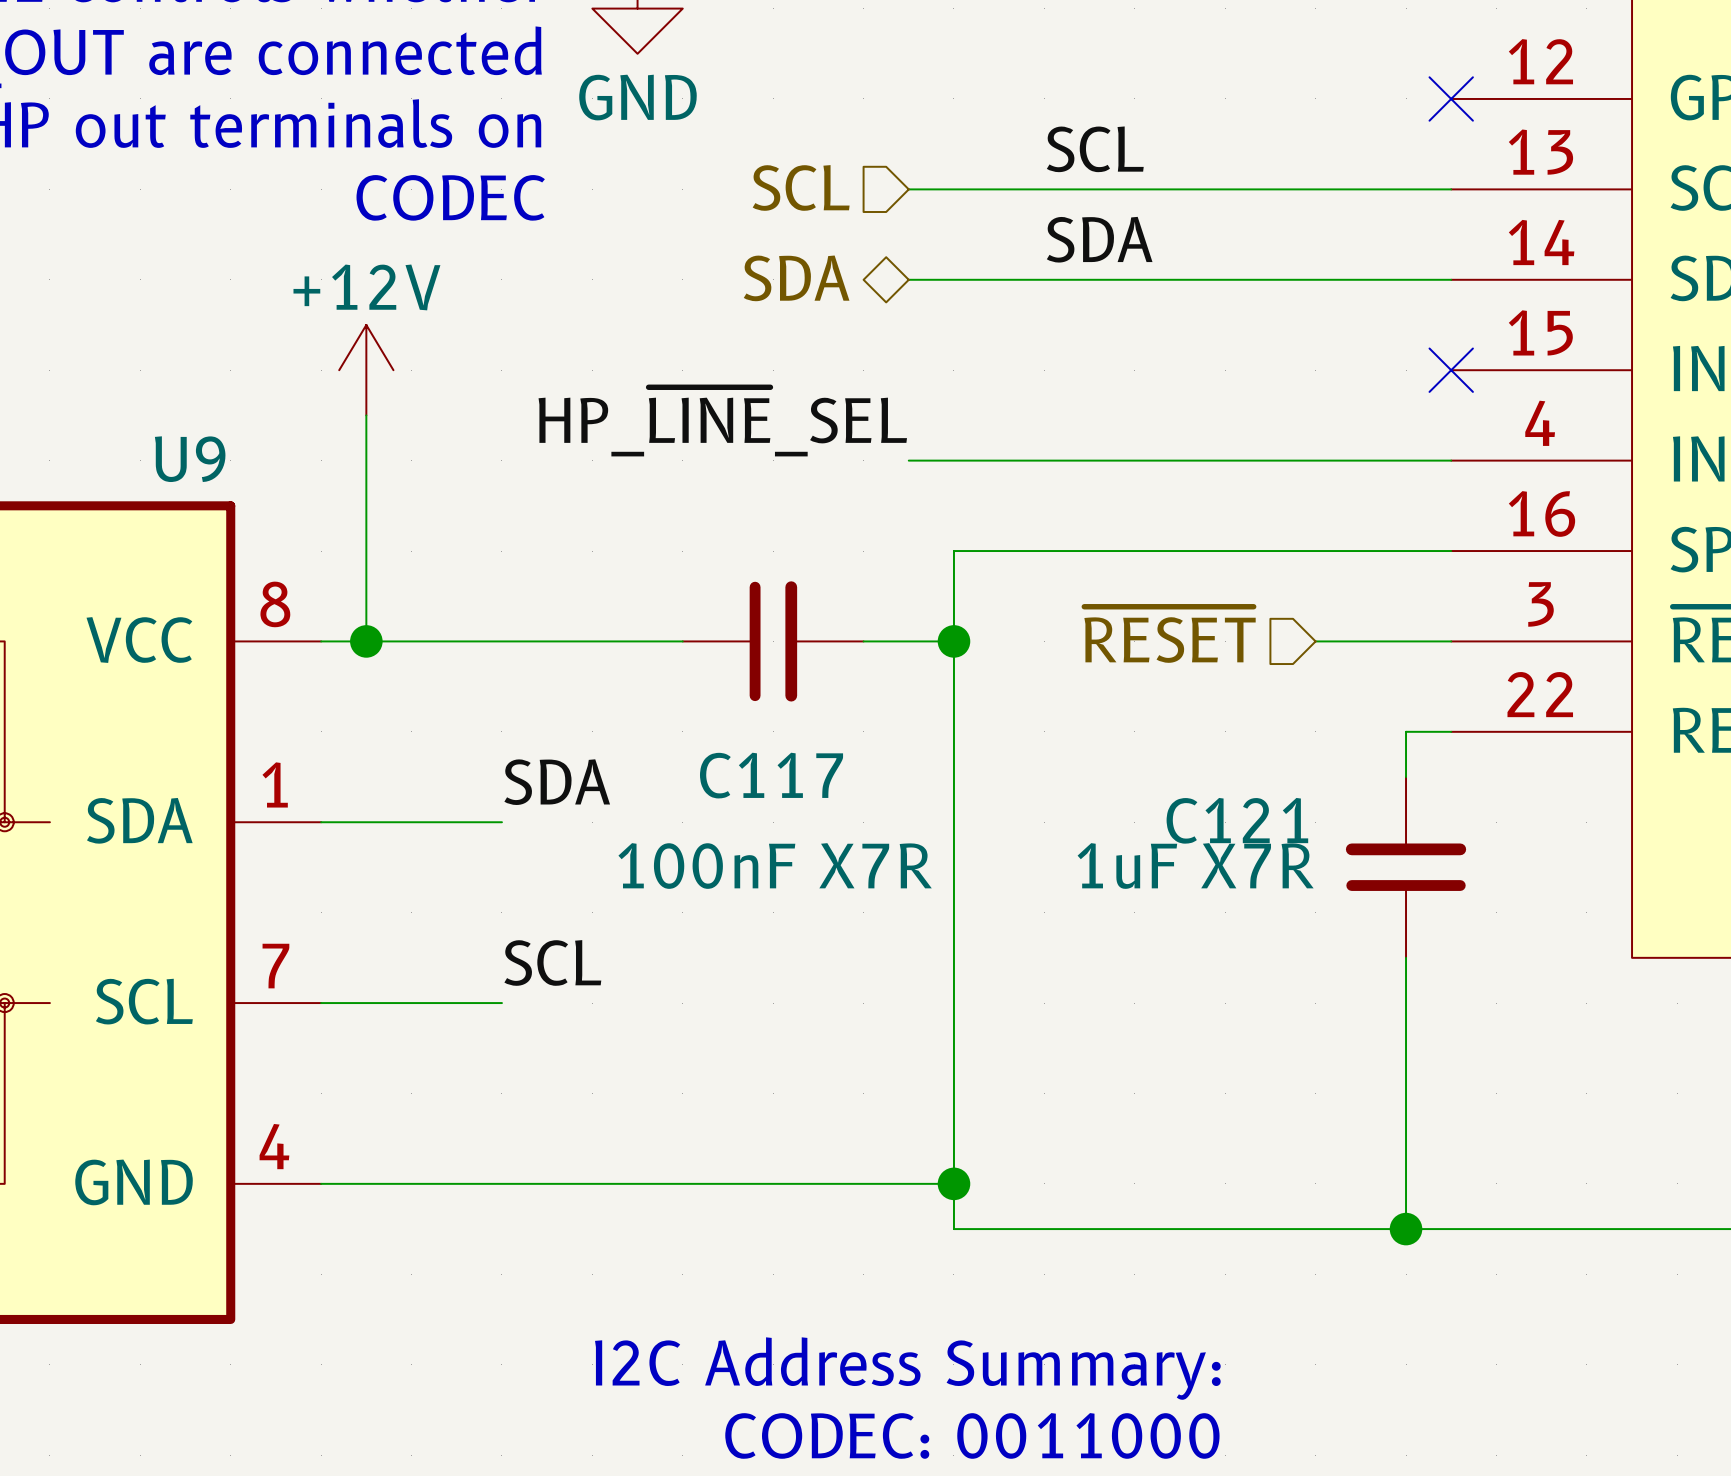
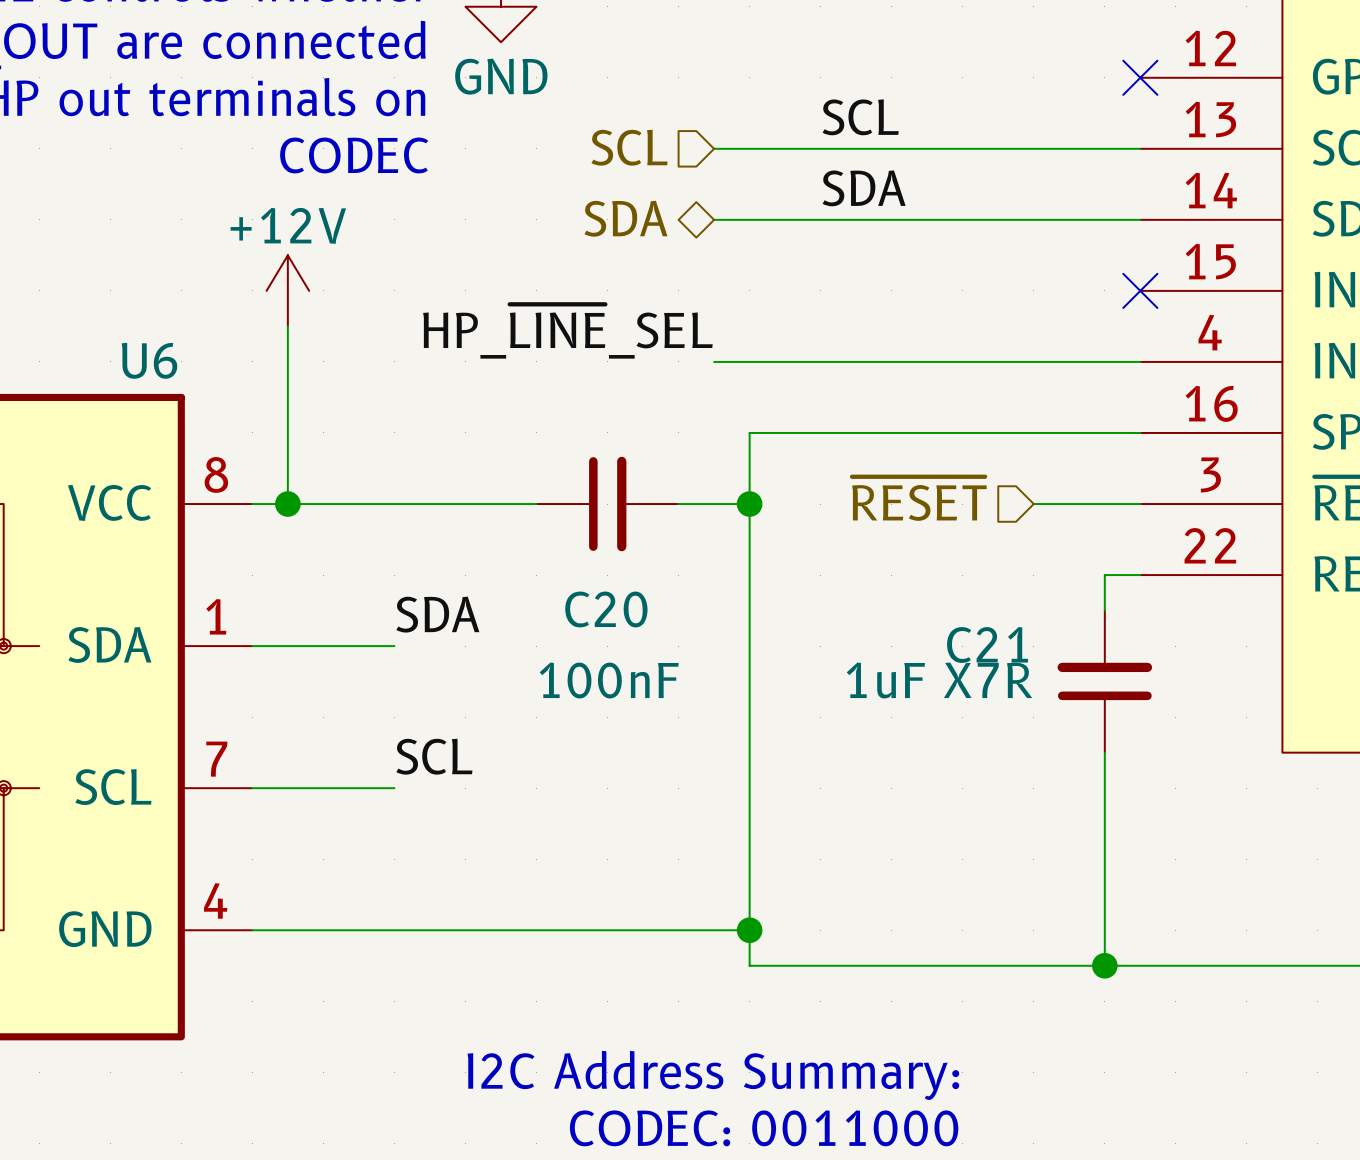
U9 name: U9 (190, 459) -> U6 (149, 360)
C117 name: C117 (771, 775) -> C20 (606, 609)
C121 name: C121 (1237, 820) -> C21 (987, 644)
C117 value: 100nF X7R (775, 866) -> 100nF (609, 680)

